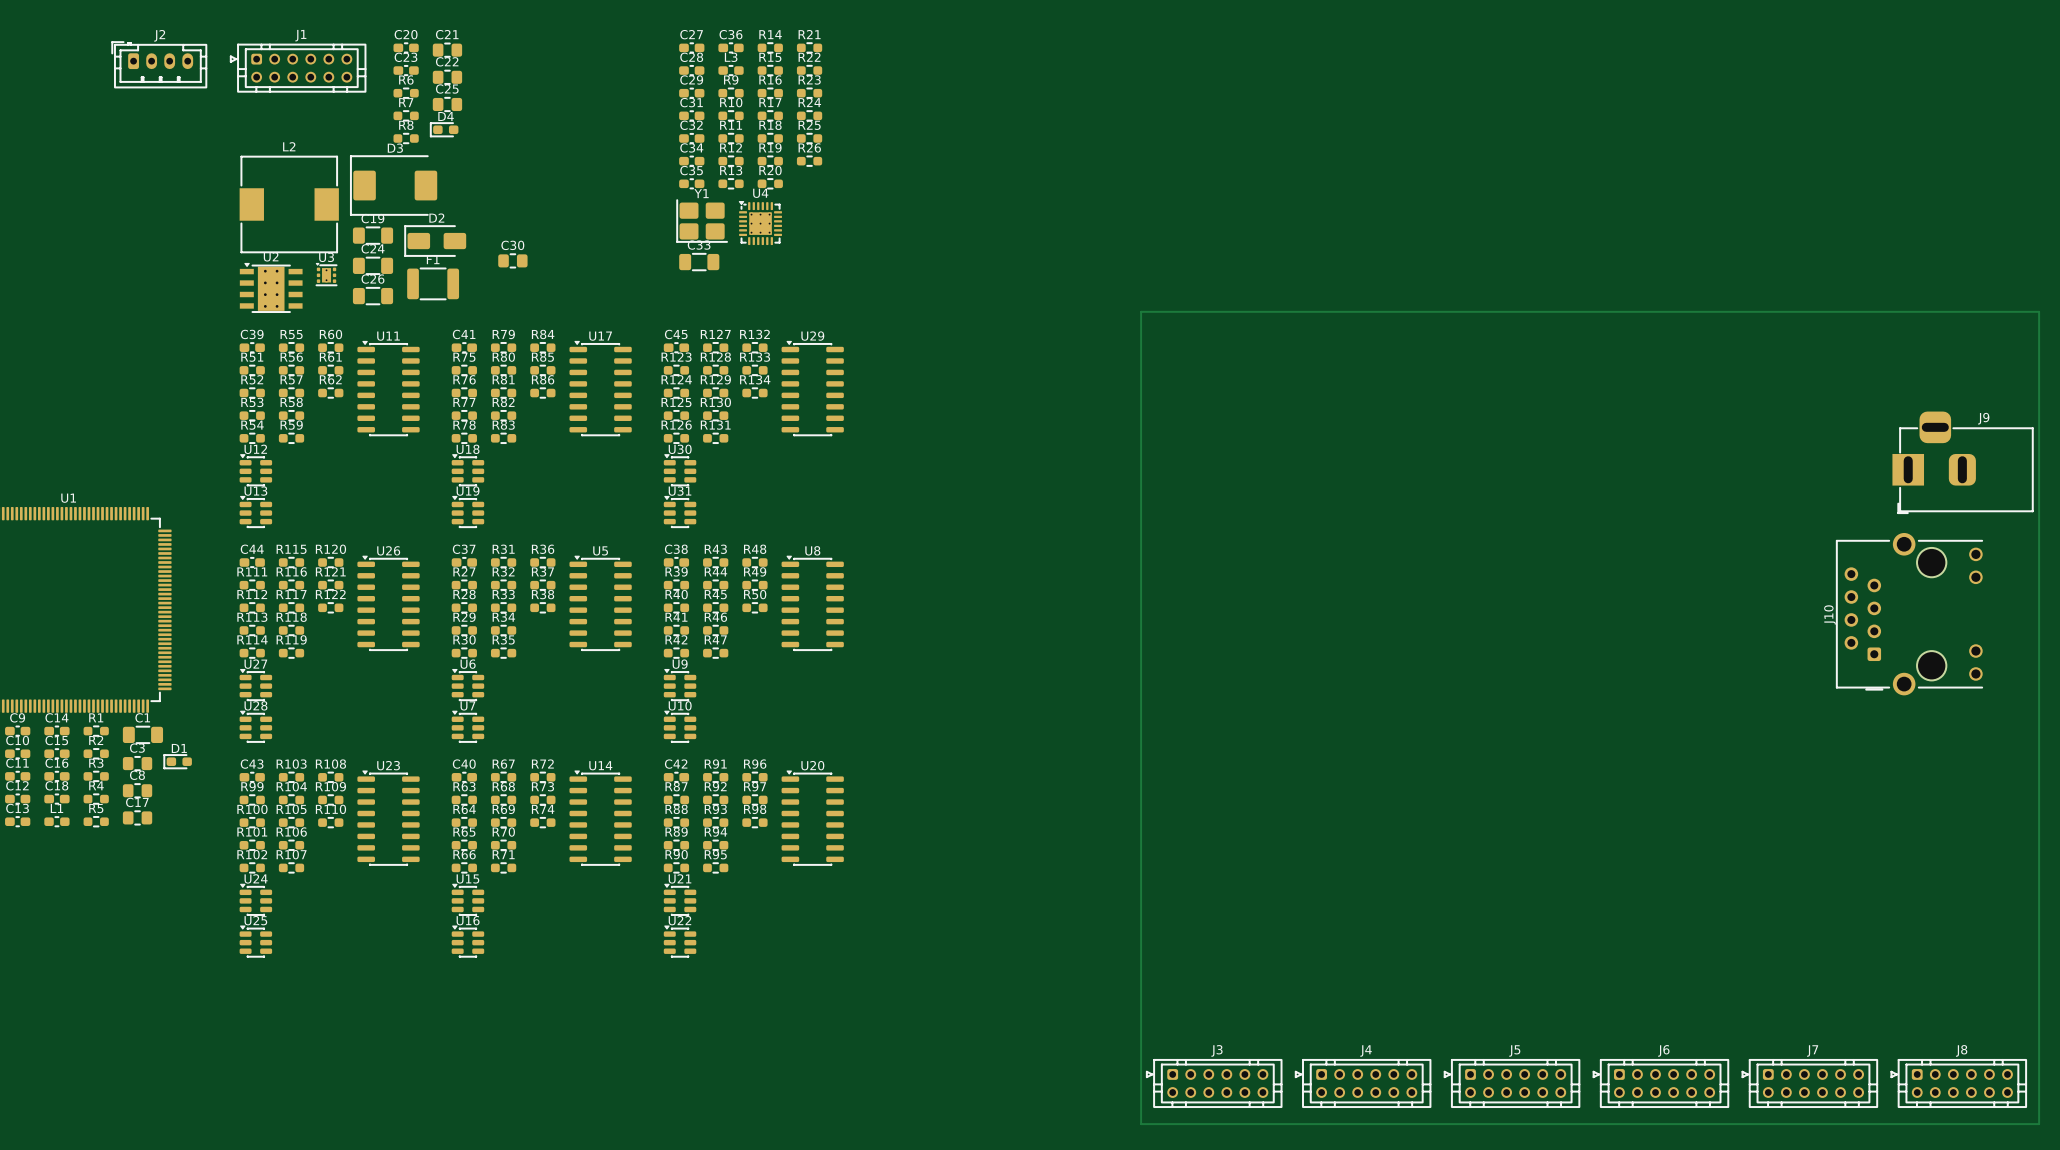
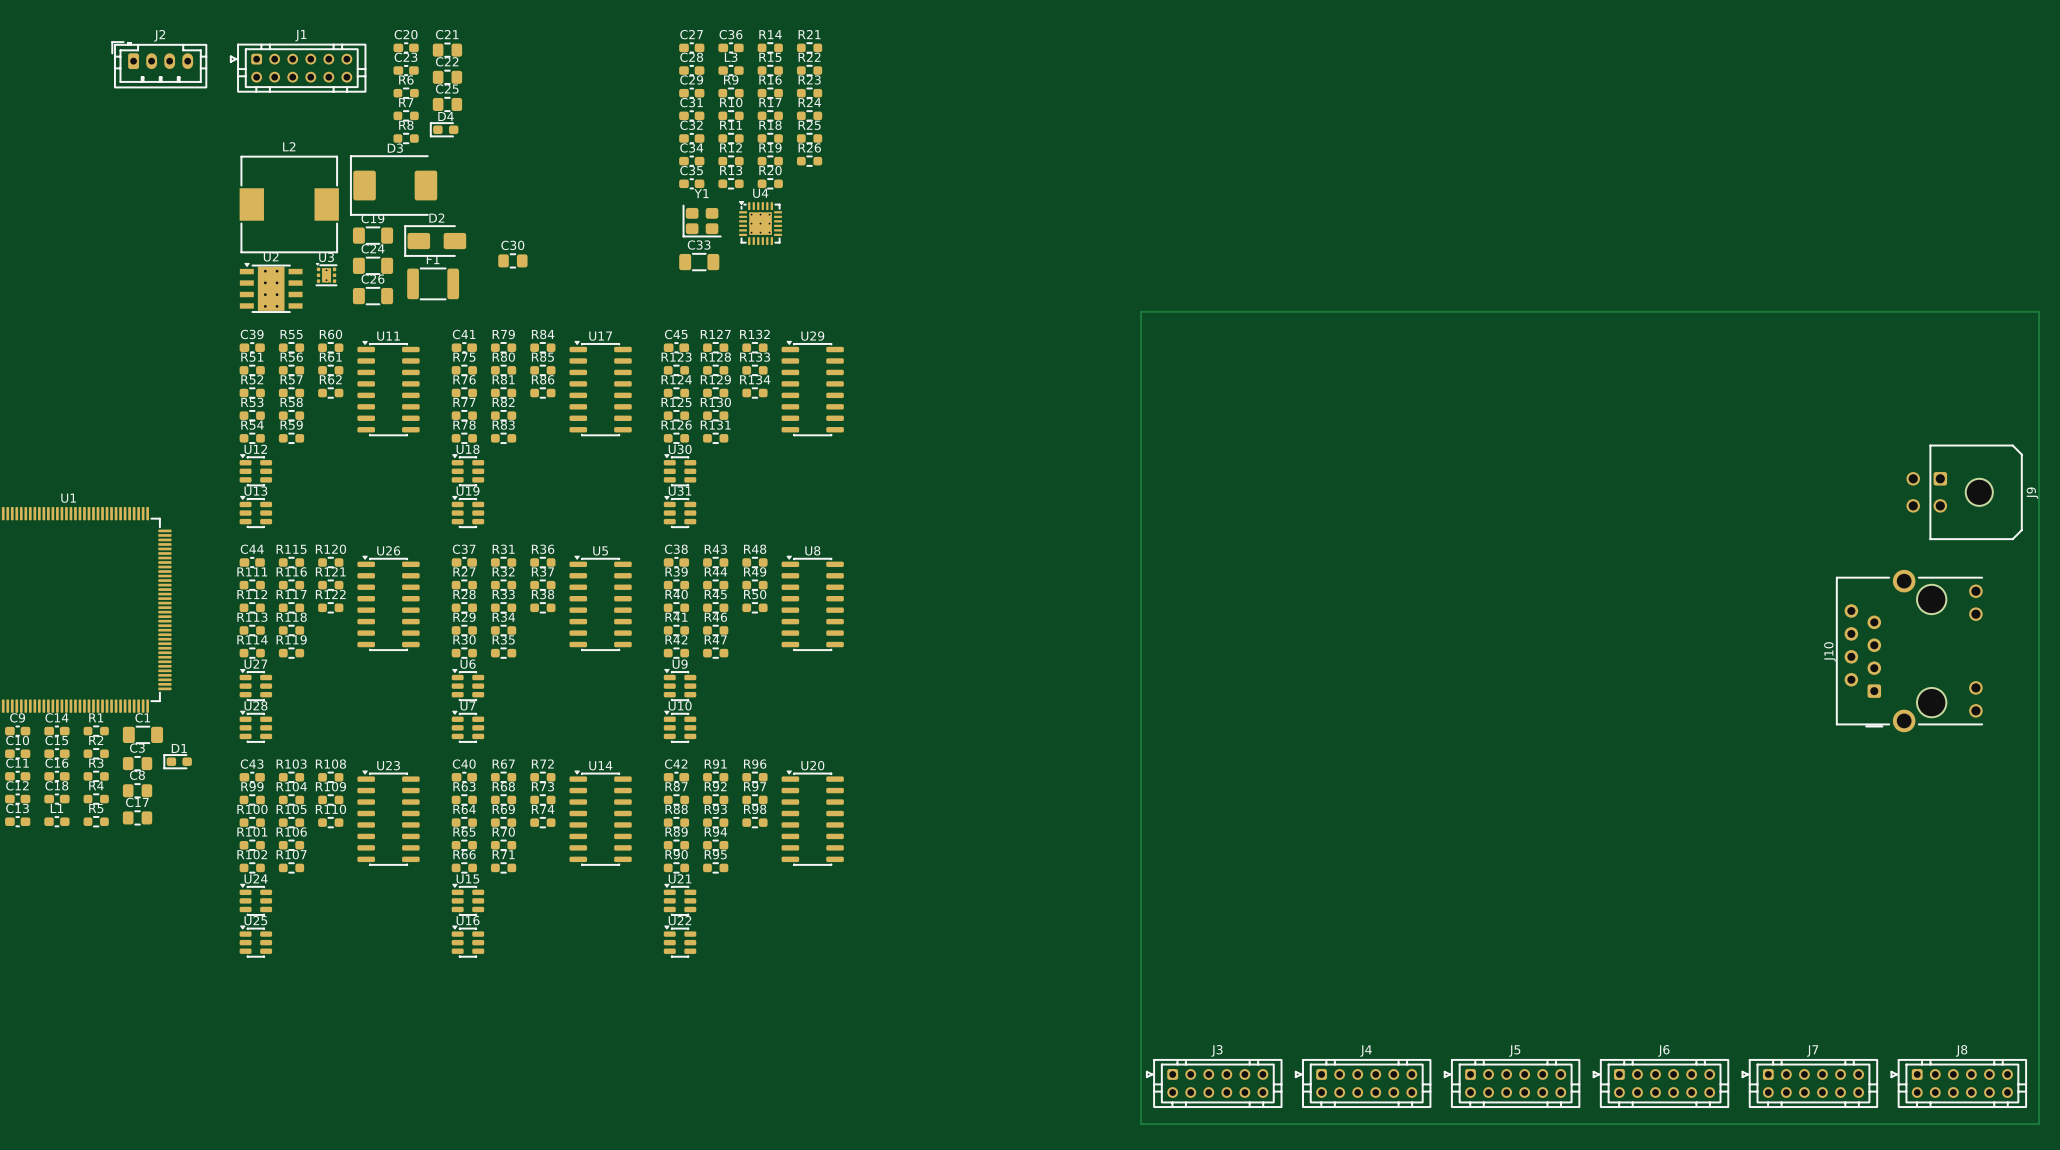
Y1 footprint: [676, 199, 728, 243] -> [682, 205, 722, 238]
J9 footprint: [1892, 411, 2034, 514] -> [1906, 445, 2023, 540]
J9 name position: J9 (1983, 418) -> J9 (2032, 493)
J10 position: (1909, 614) -> (1909, 651)

